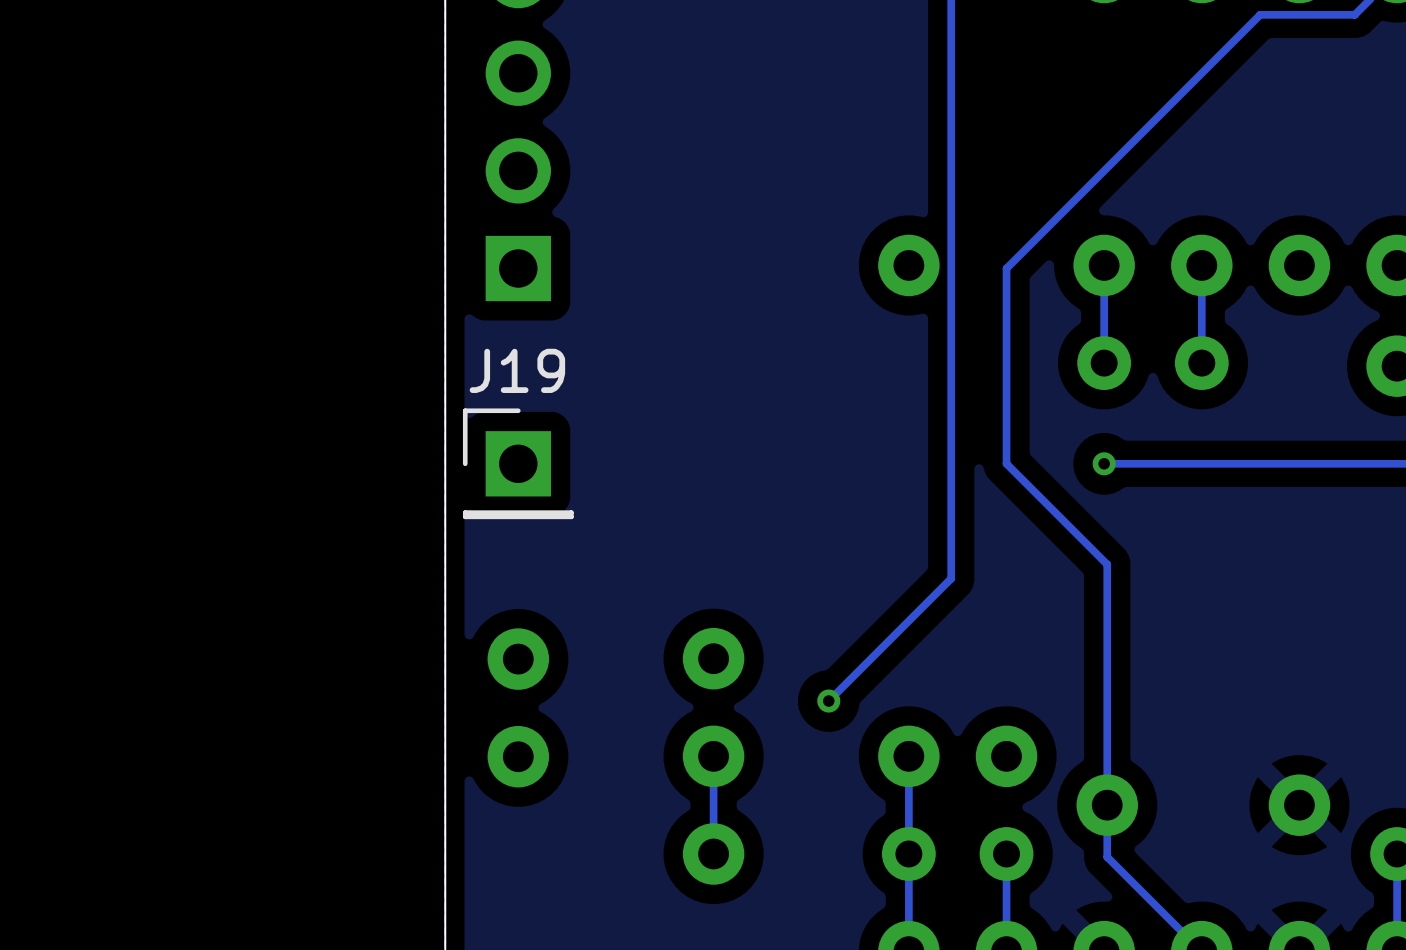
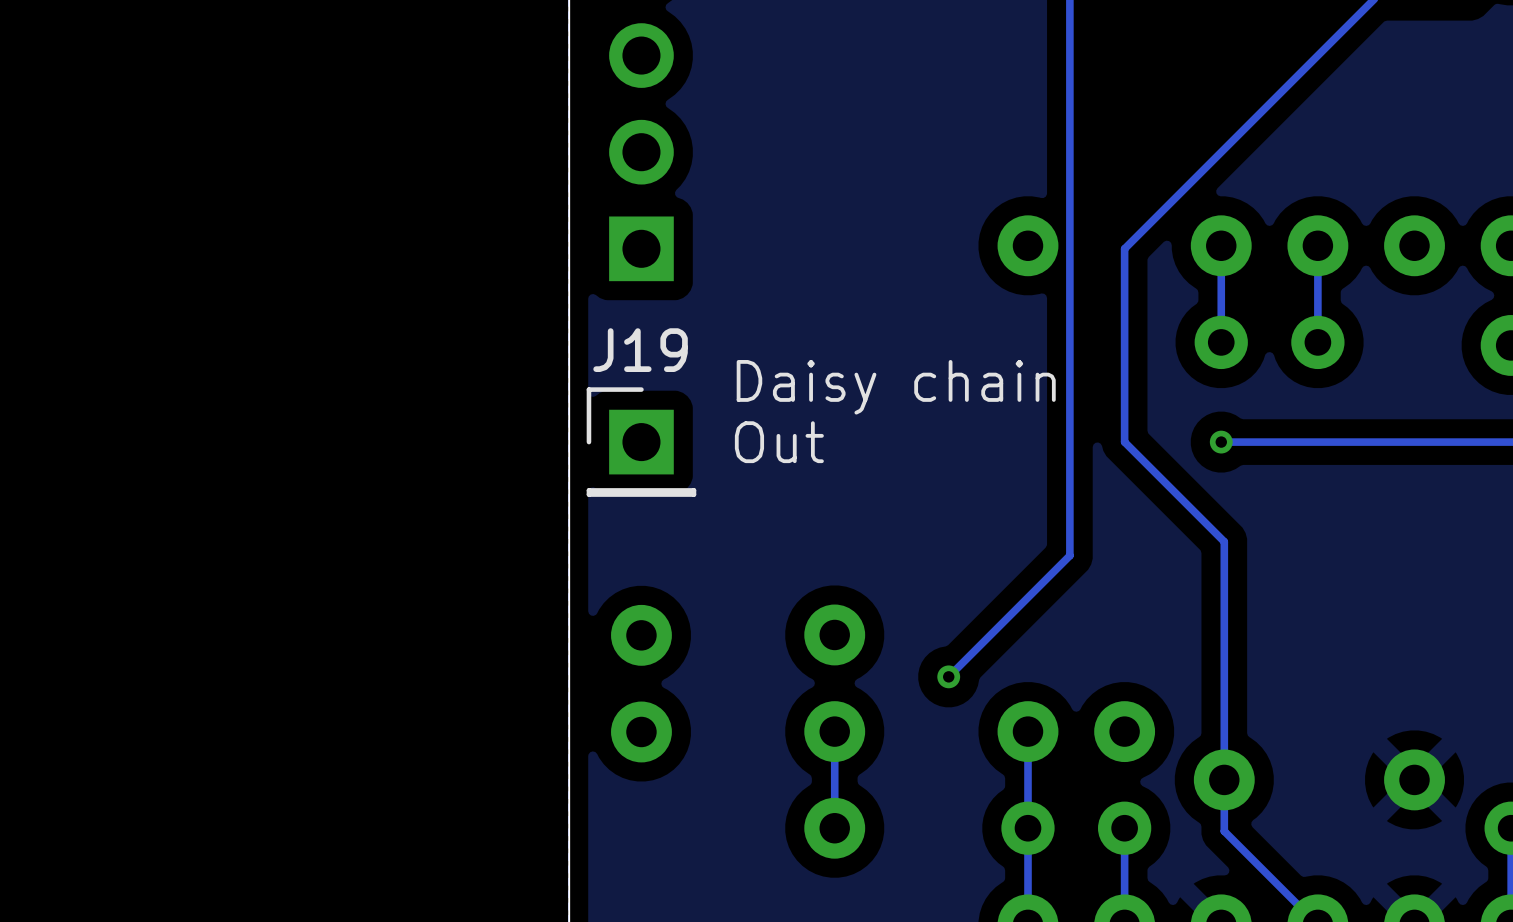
text: none -> Daisy chain (896, 387)
text: none -> Out (779, 442)

